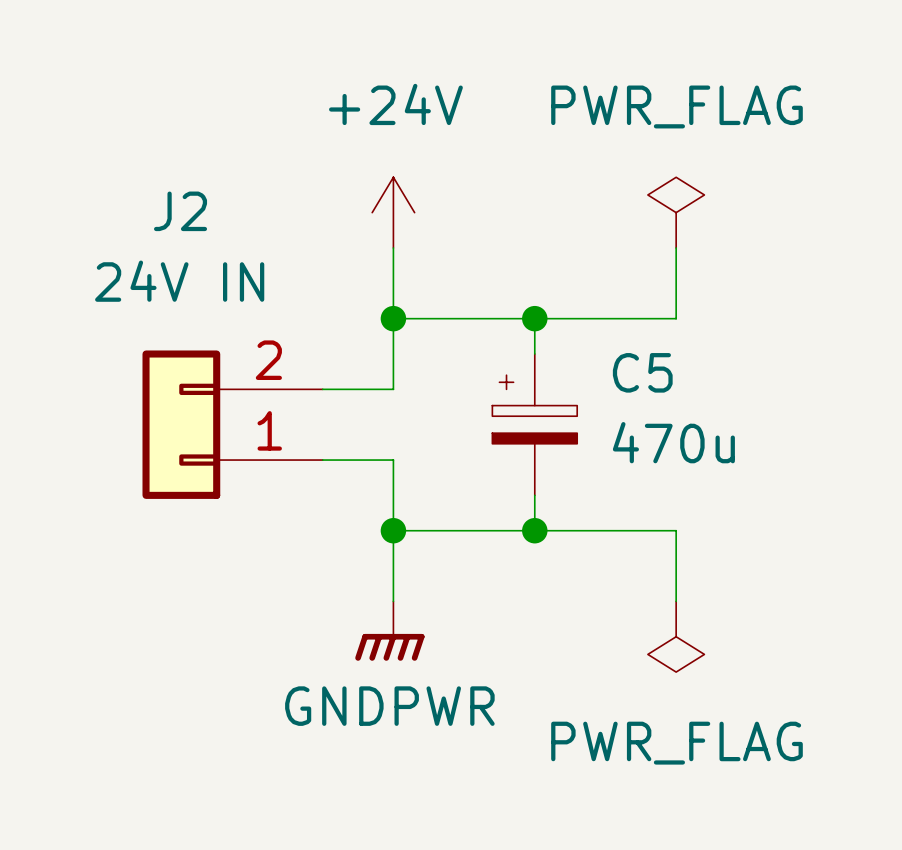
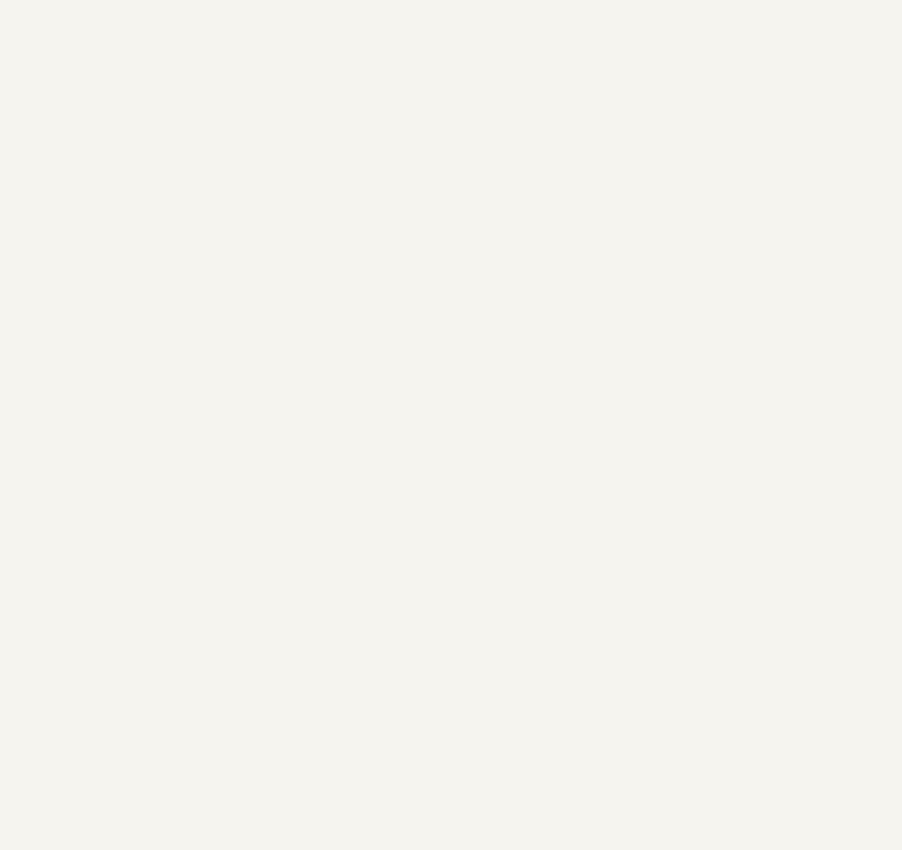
power symbol: +24V (393, 212) -> none
power symbol: PWR_FLAG (676, 212) -> none
wire: (393, 247) (393, 389) (322, 389) -> none
wire: (676, 247) (676, 318) (393, 318) -> none
junction: (393, 318) -> none
wire: (534, 318) (534, 354) -> none
junction: (534, 318) -> none
J2: 24V IN (232, 424) -> none
C5: 470u (534, 424) -> none
wire: (322, 460) (393, 460) (393, 601) -> none
wire: (534, 495) (534, 530) -> none
wire: (393, 530) (676, 530) (676, 601) -> none
junction: (393, 530) -> none
junction: (534, 530) -> none
power symbol: GNDPWR (389, 631) -> none
power symbol: PWR_FLAG (676, 636) -> none

